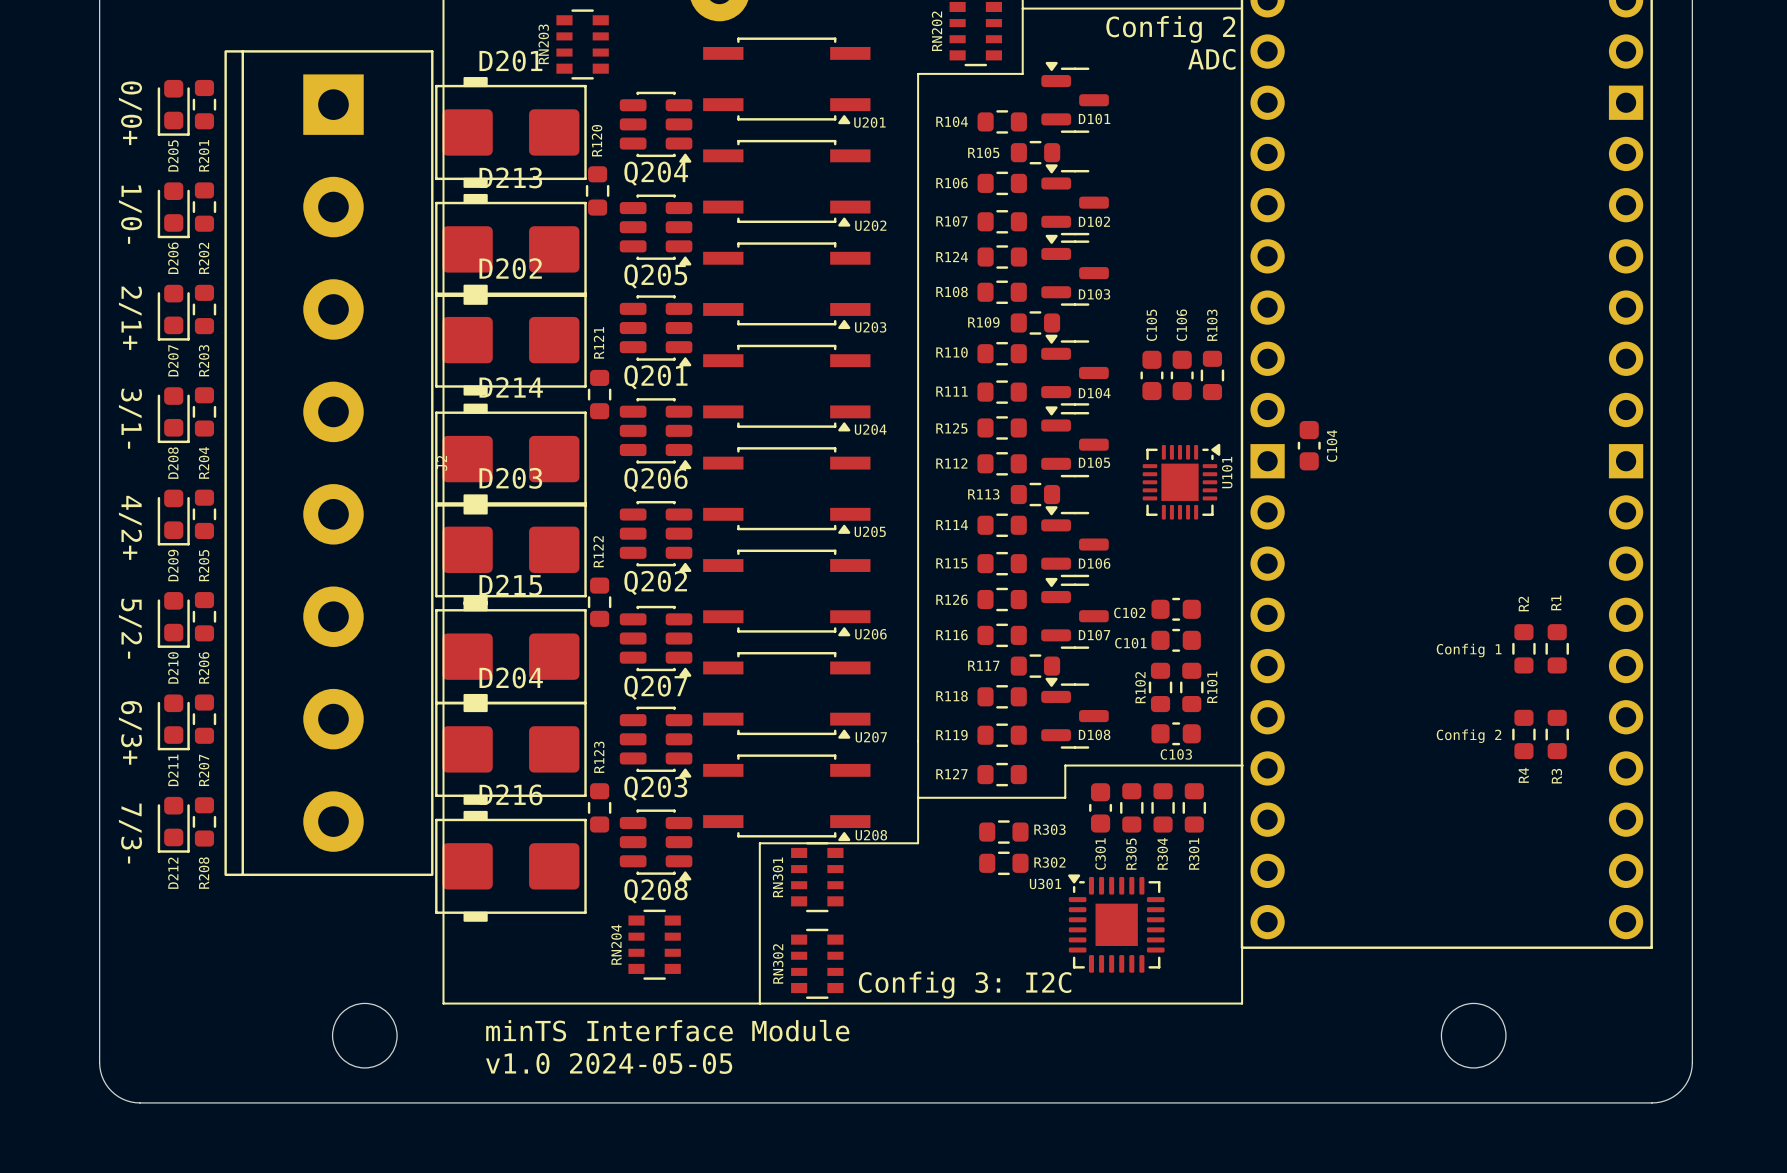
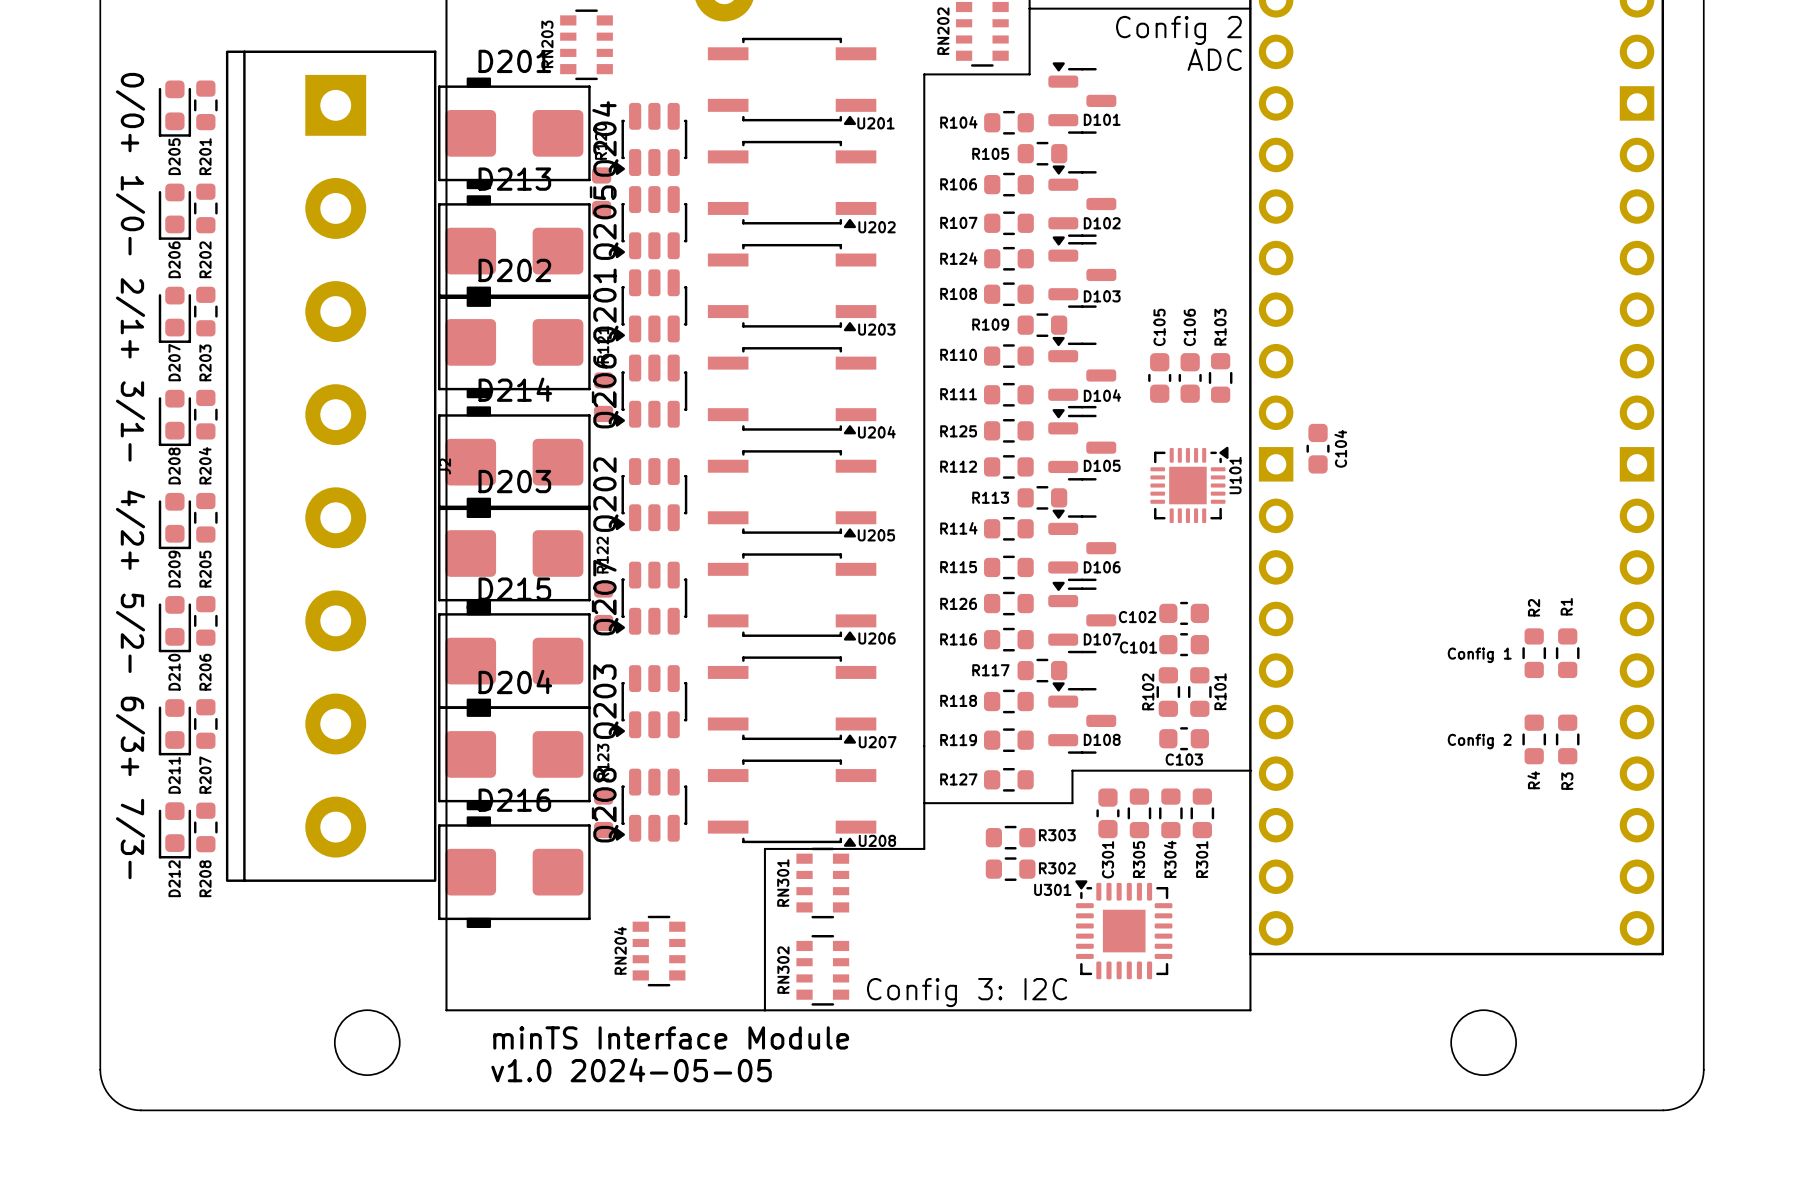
Q204 rotation: 0° (656, 127) -> 90° clockwise (651, 139)
Q205 rotation: 0° (656, 230) -> 90° clockwise (651, 222)
Q201 rotation: 0° (656, 330) -> 90° clockwise (651, 305)
Q206 rotation: 0° (656, 433) -> 90° clockwise (651, 391)
Q206 position: (656, 433) -> (651, 391)
Q202 rotation: 0° (656, 536) -> 90° clockwise (651, 494)
Q202 position: (656, 536) -> (651, 494)
Q207 rotation: 0° (656, 641) -> 90° clockwise (651, 598)
Q207 position: (656, 641) -> (651, 598)
Q203 rotation: 0° (656, 742) -> 90° clockwise (651, 701)
Q203 position: (656, 742) -> (651, 701)
Q208 rotation: 0° (656, 844) -> 90° clockwise (651, 805)
Q208 position: (656, 844) -> (651, 805)

